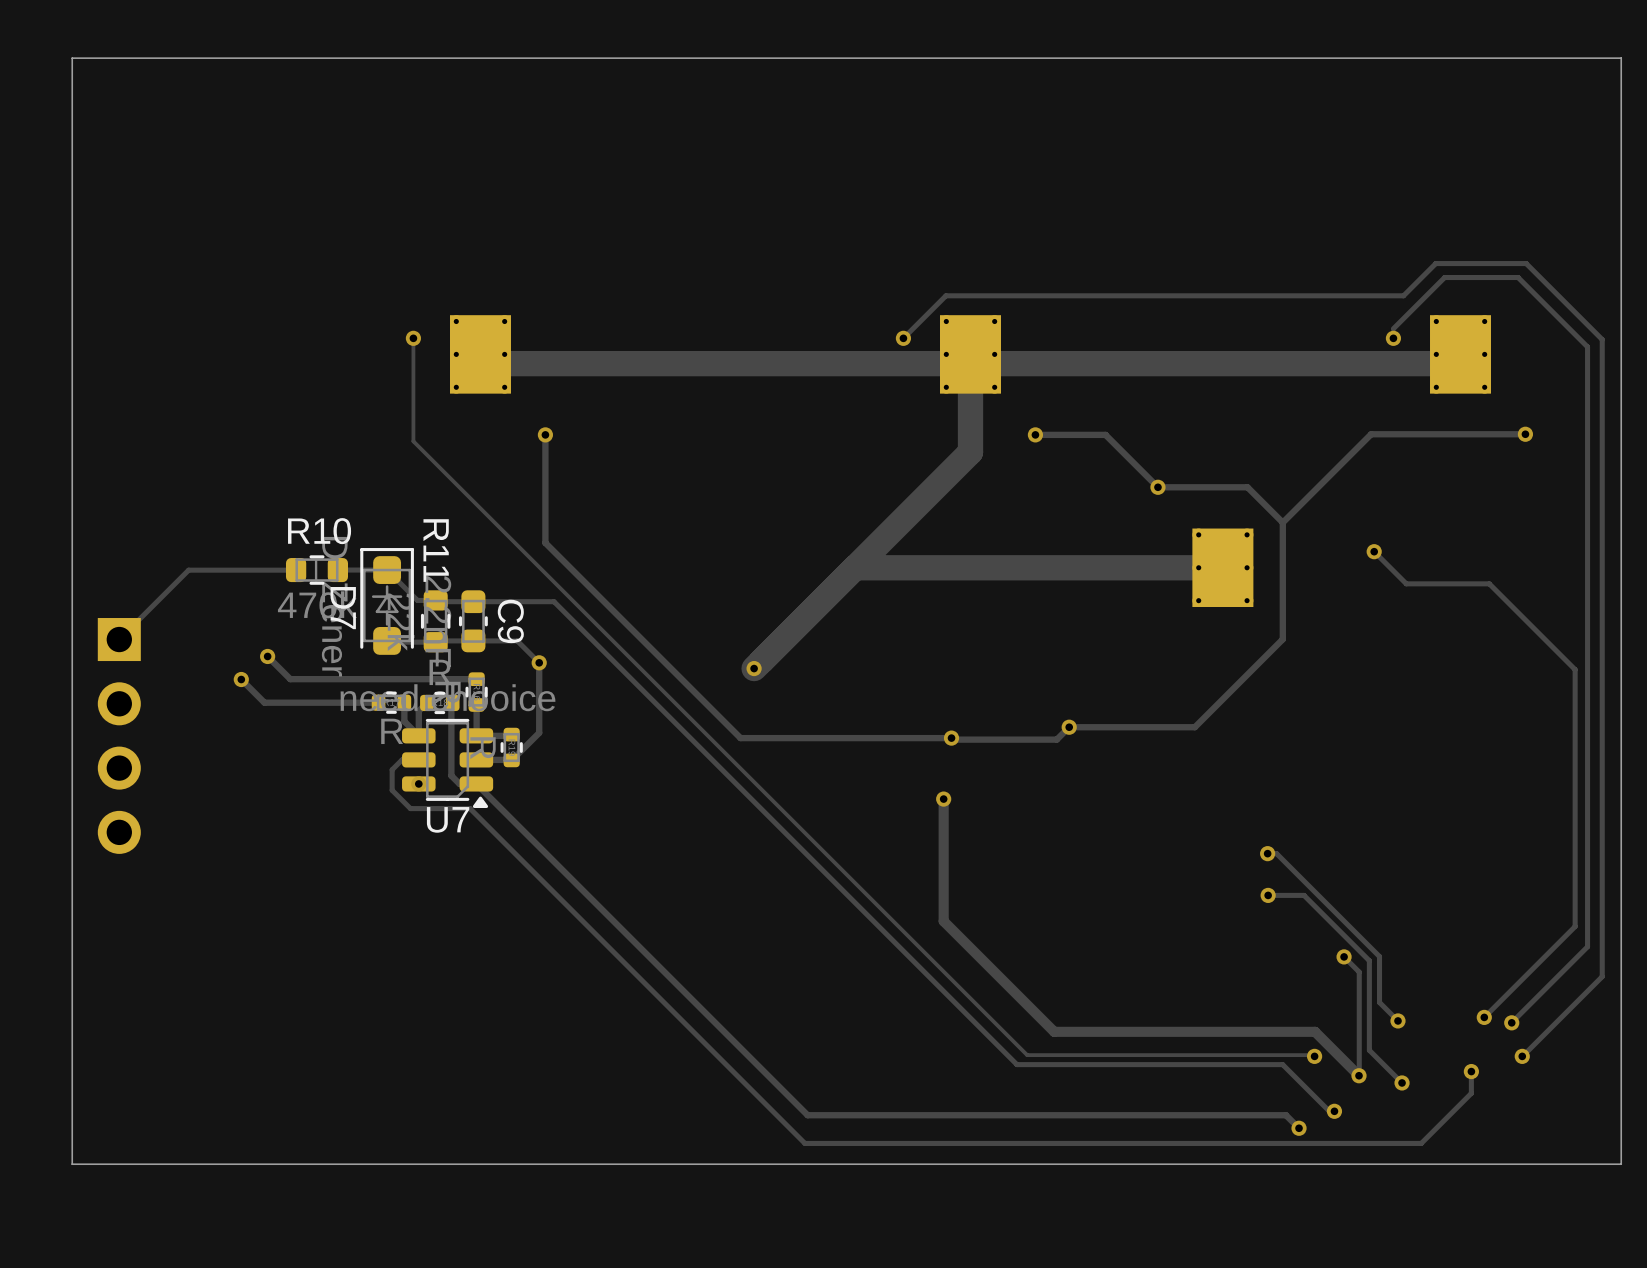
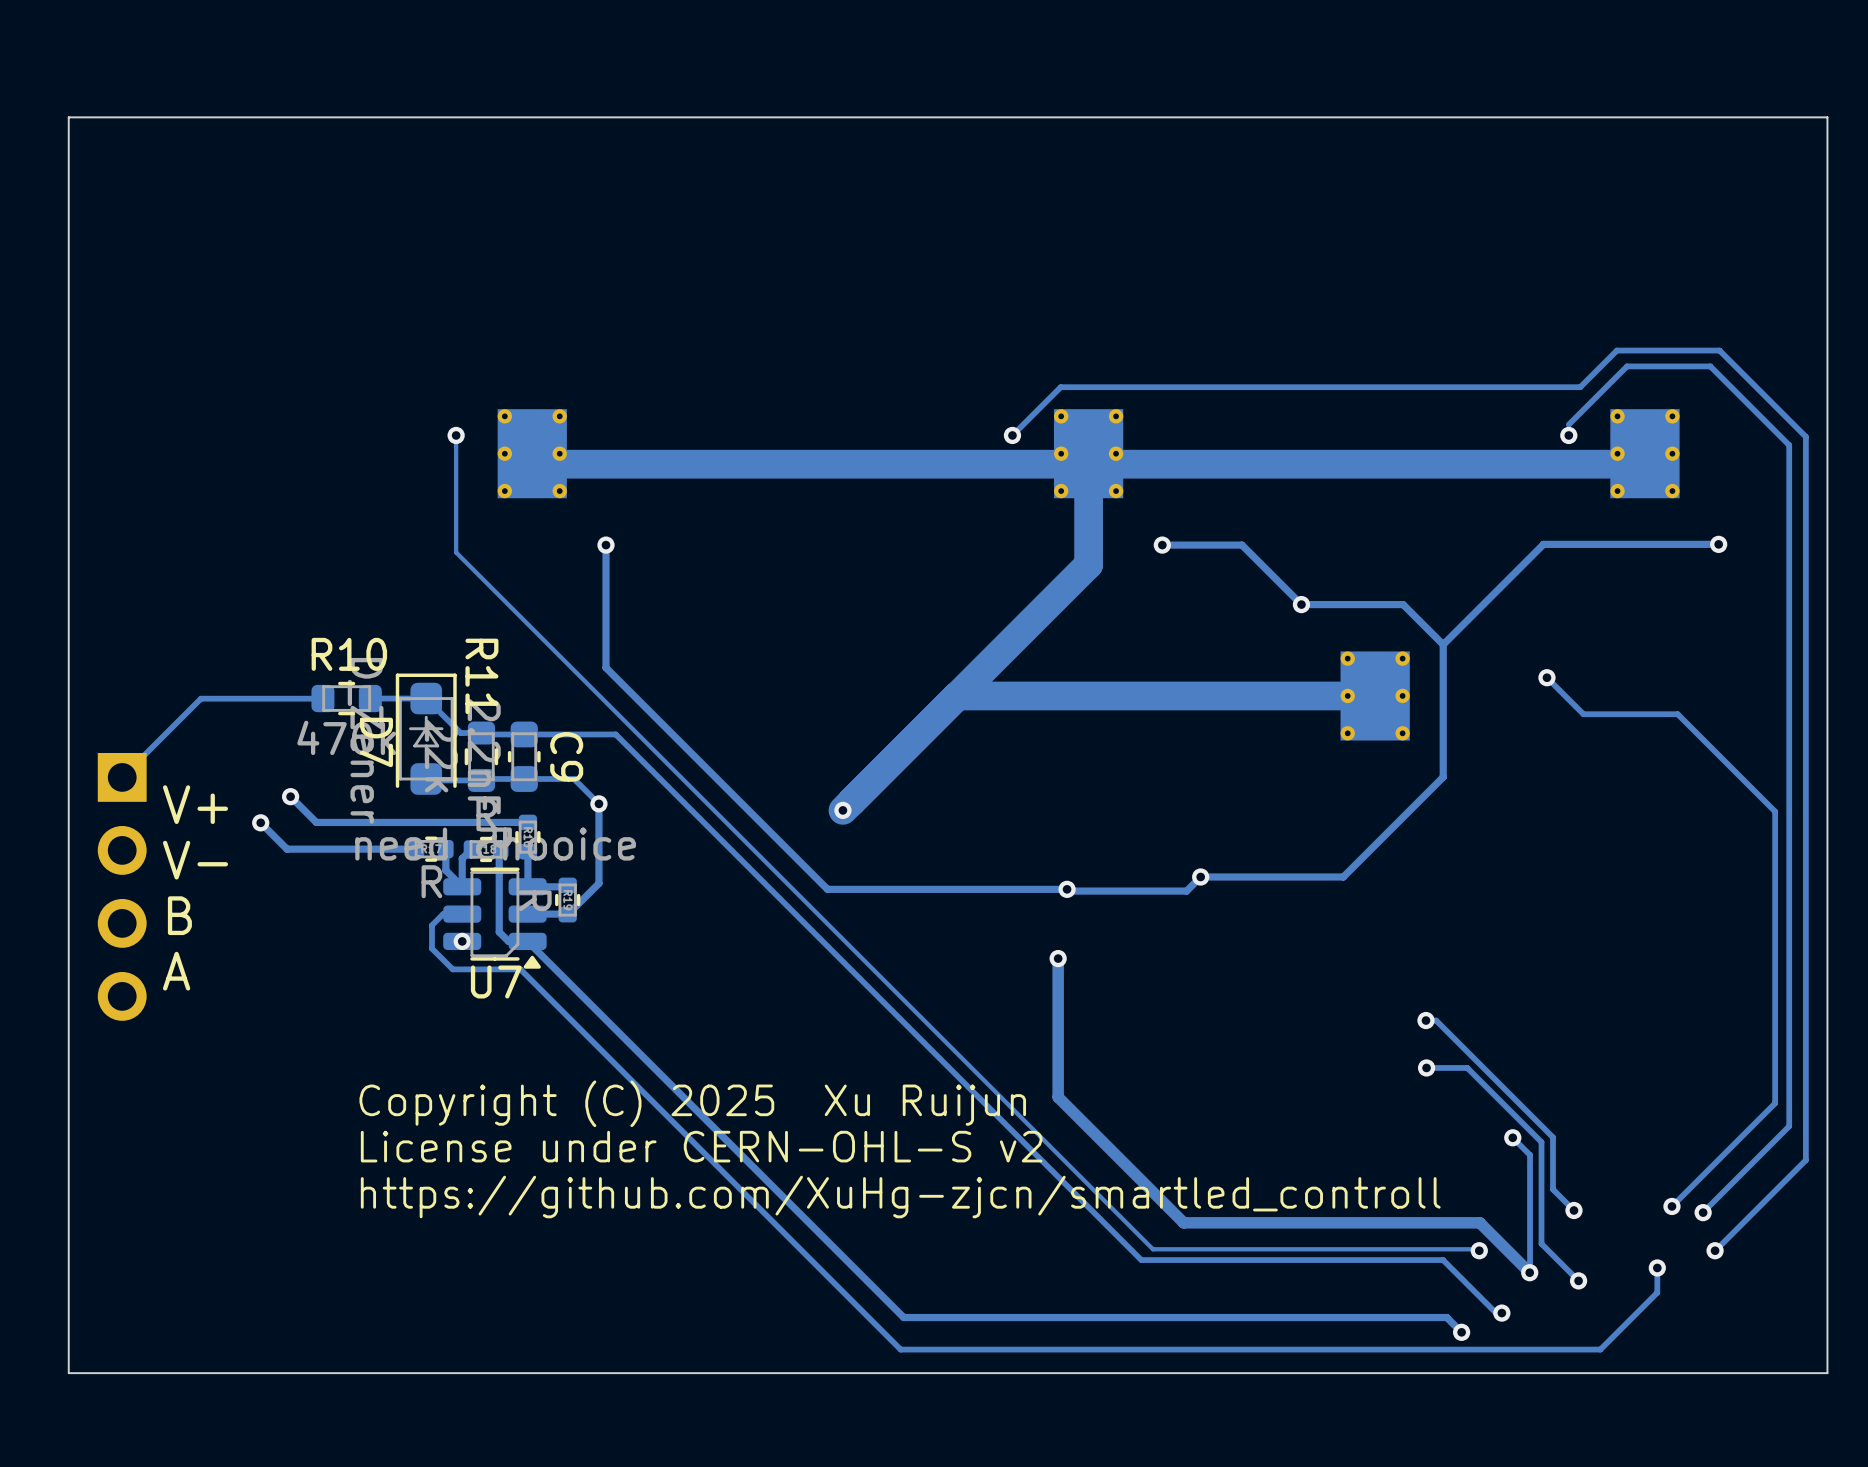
text: none -> V+ (195, 804)
text: none -> V- (195, 860)
text: none -> B (179, 915)
text: none -> A (176, 971)
text: none -> Copyright (C) 2025 Xu Ruijun (692, 1103)
text: none -> License under CERN-OHL-S v2 (701, 1146)
text: none -> https://github.com/XuHg-zjcn/smartled_controll (900, 1196)

